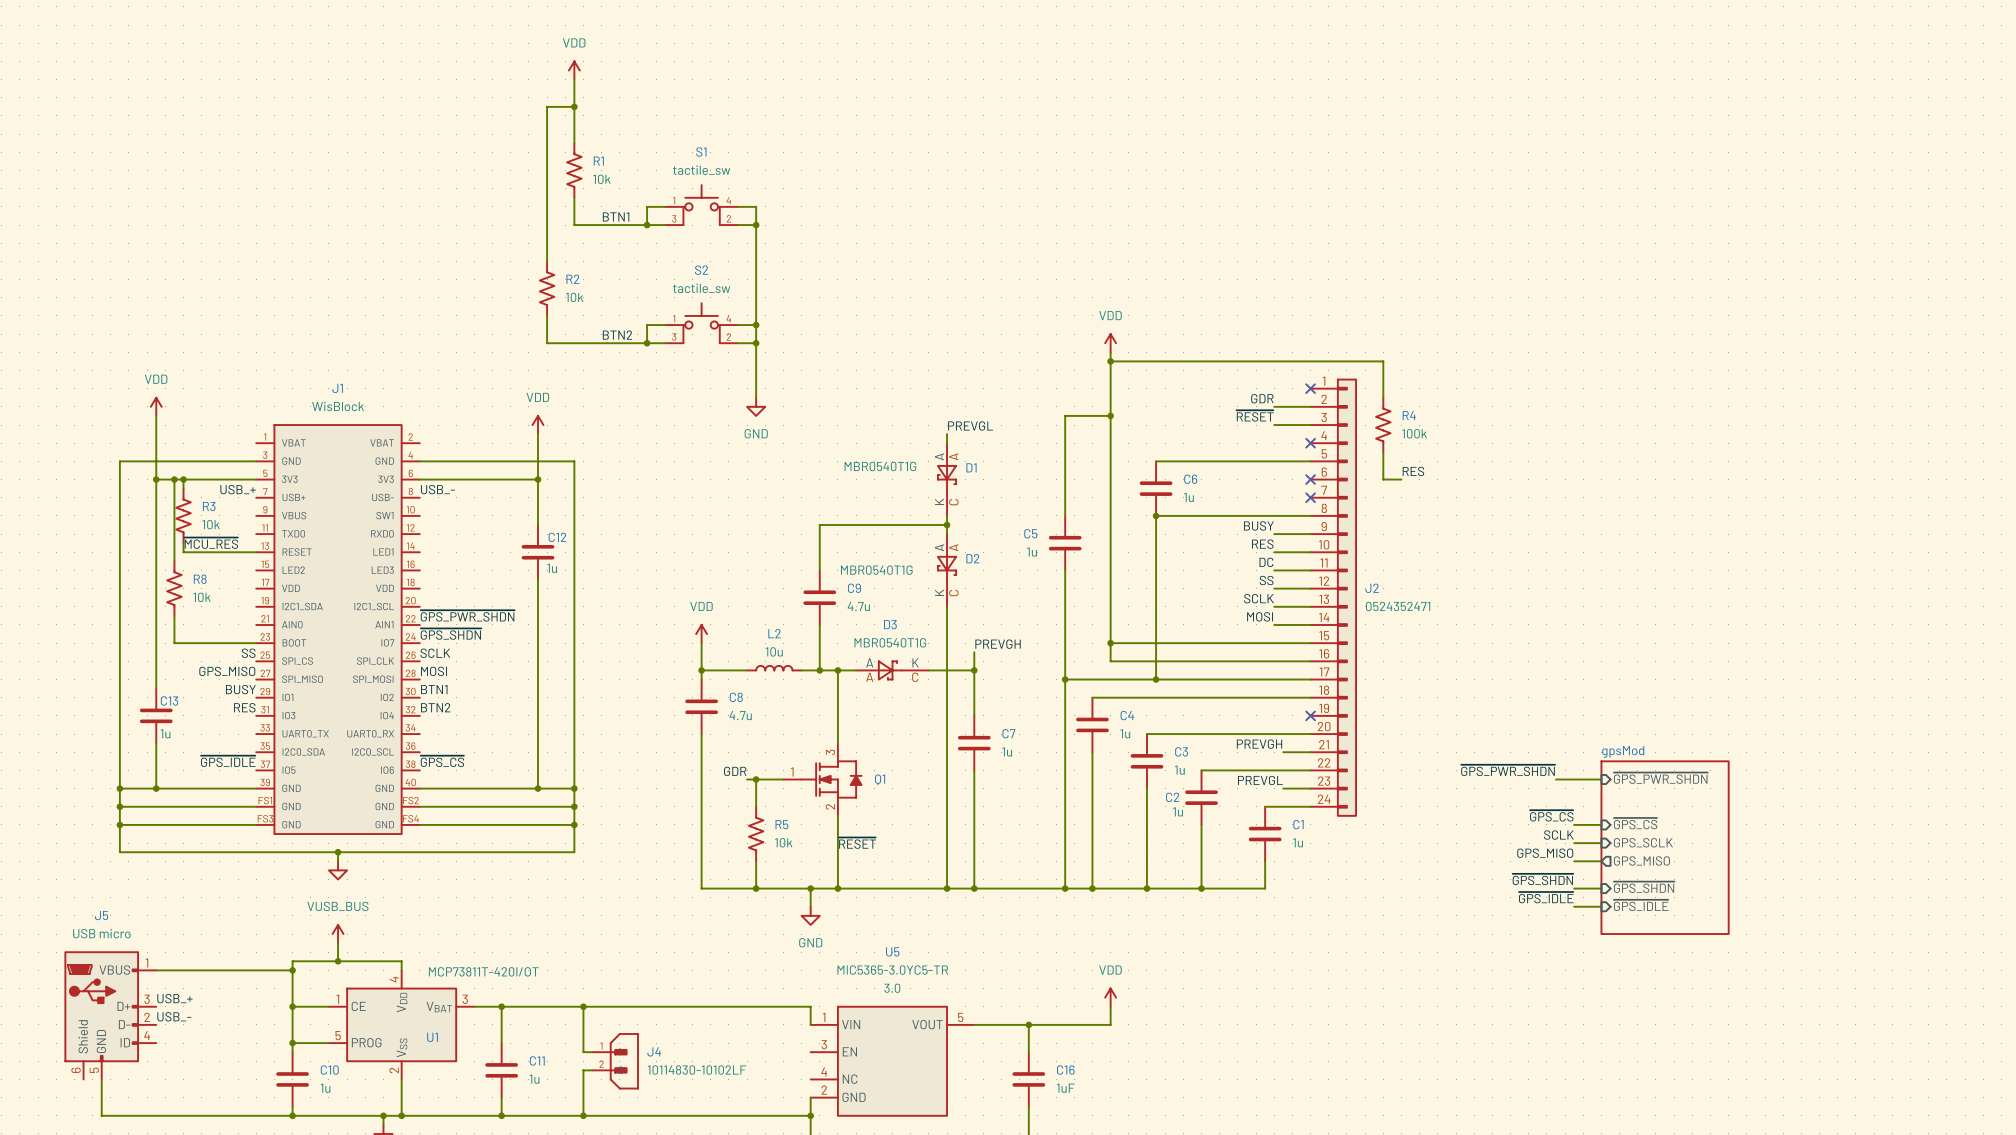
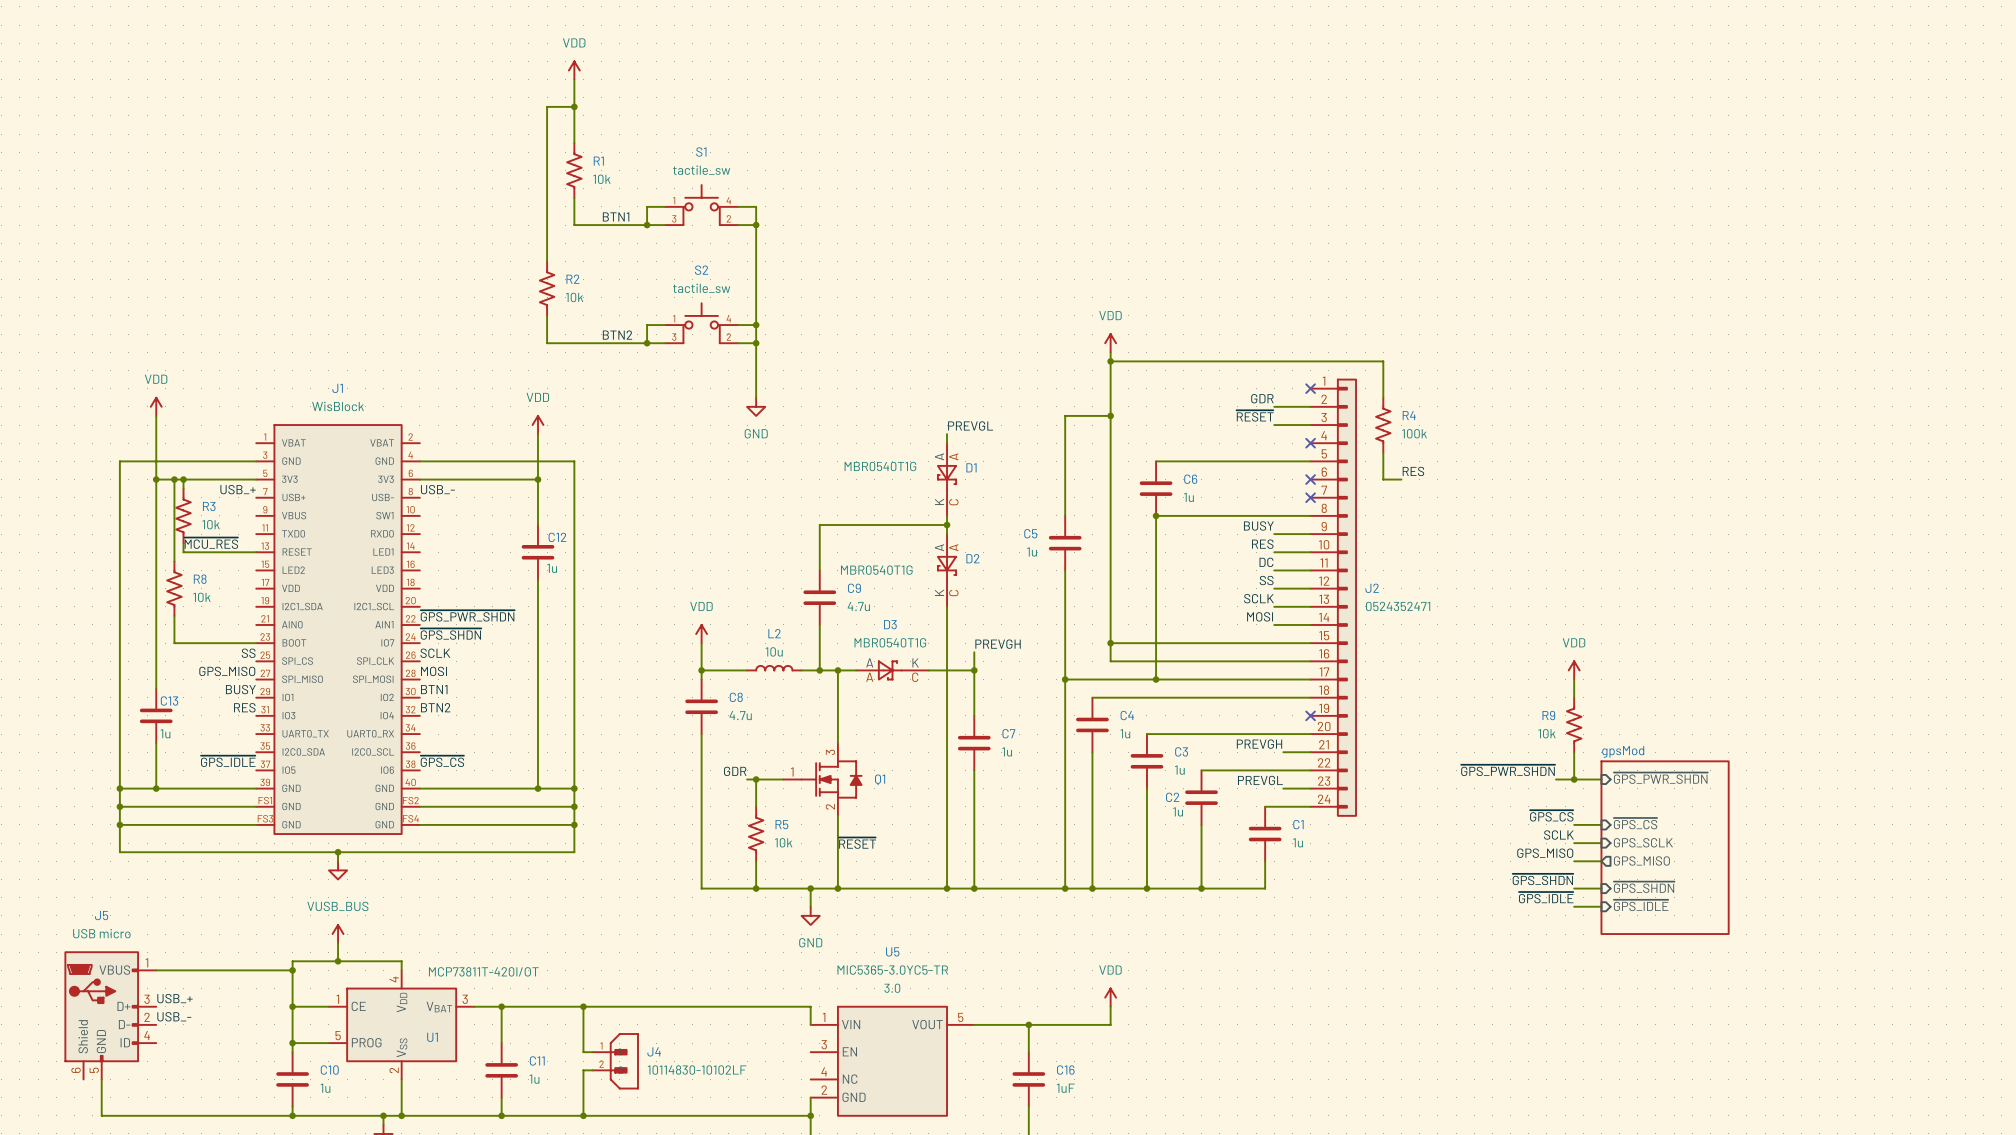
power symbol: none -> VDD (1574, 670)
wire: none -> (1574, 679) (1574, 697)
R9: none -> 10k (1574, 724)
wire: none -> (1574, 752) (1574, 779)
junction: none -> (1574, 779)

